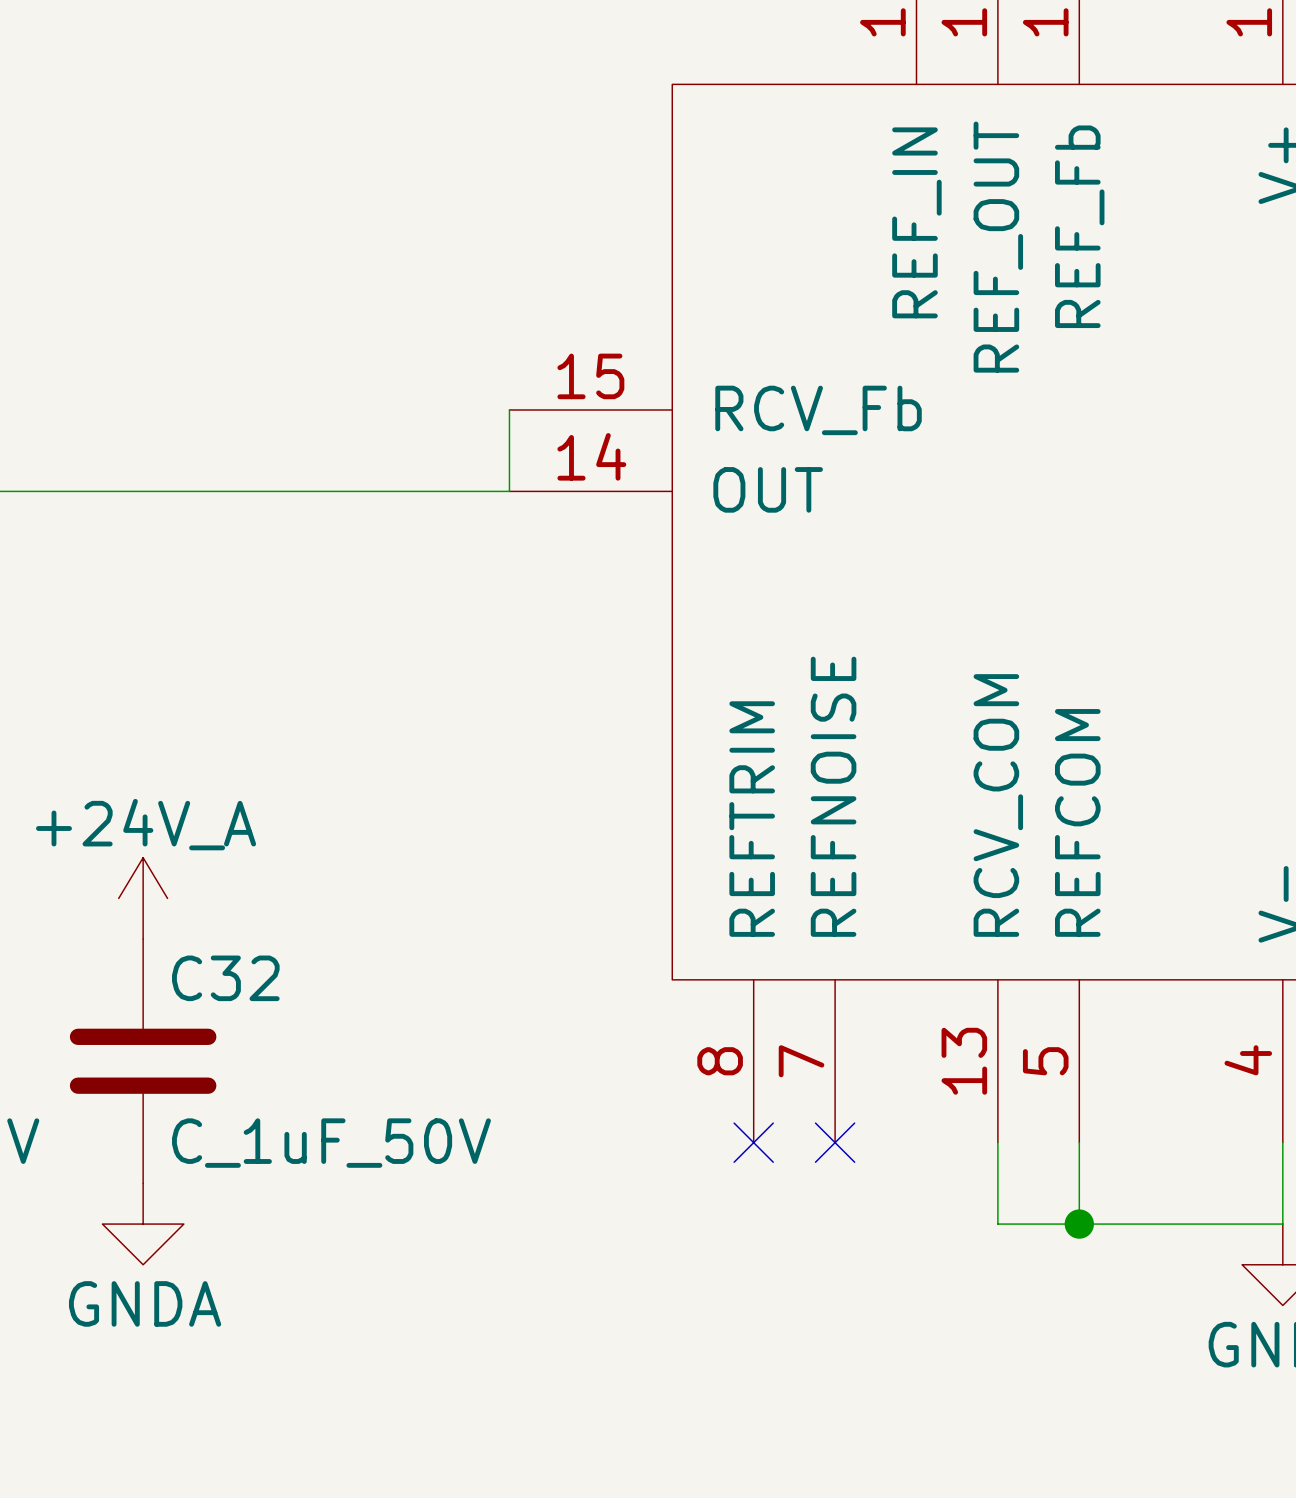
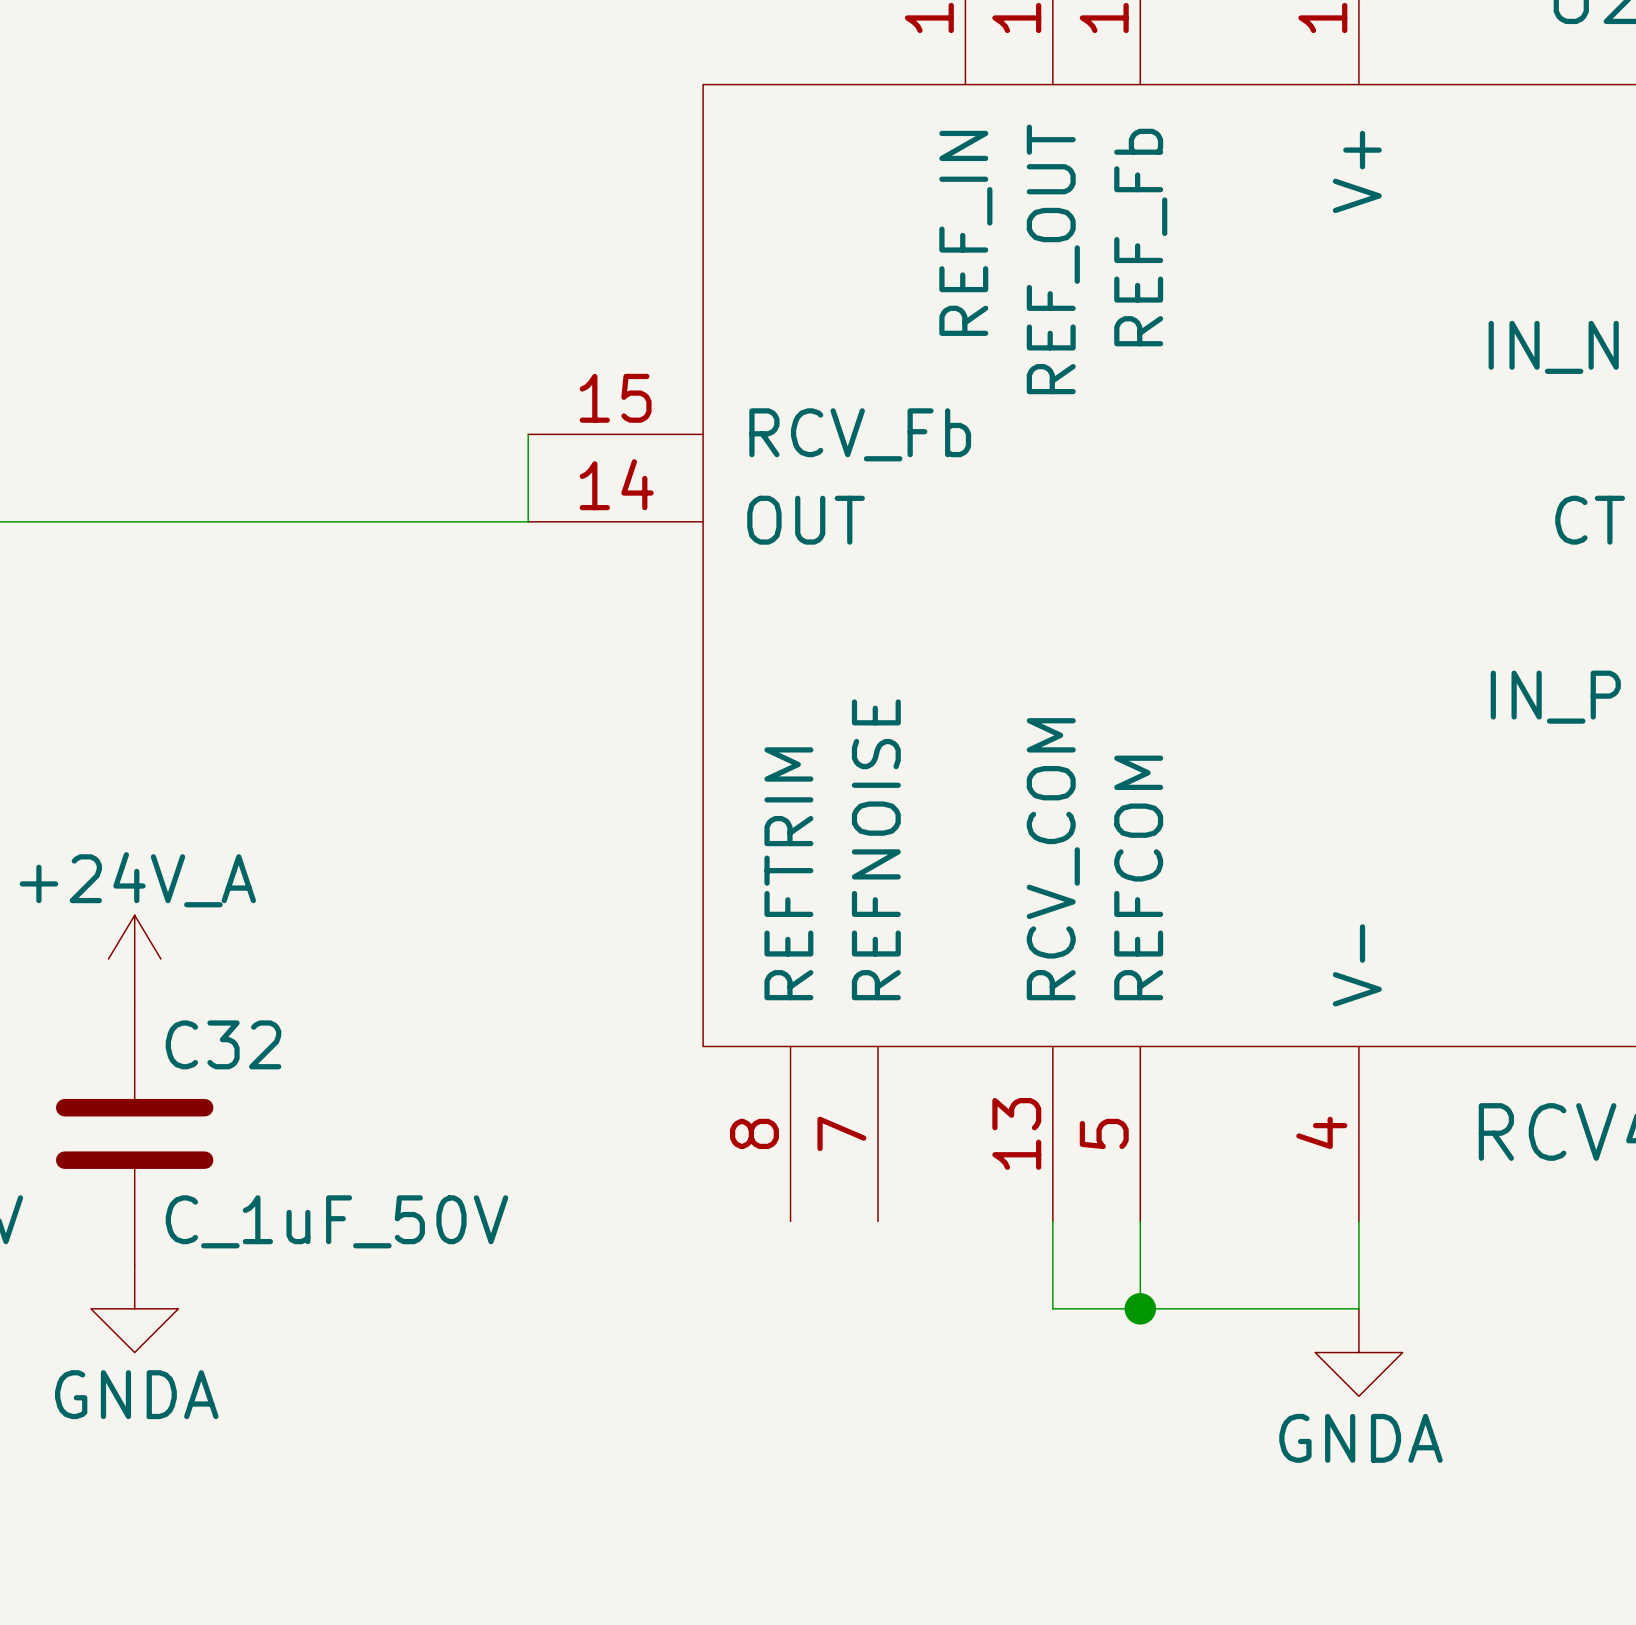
no-connect mark: (753, 1142) -> none
no-connect mark: (835, 1142) -> none

